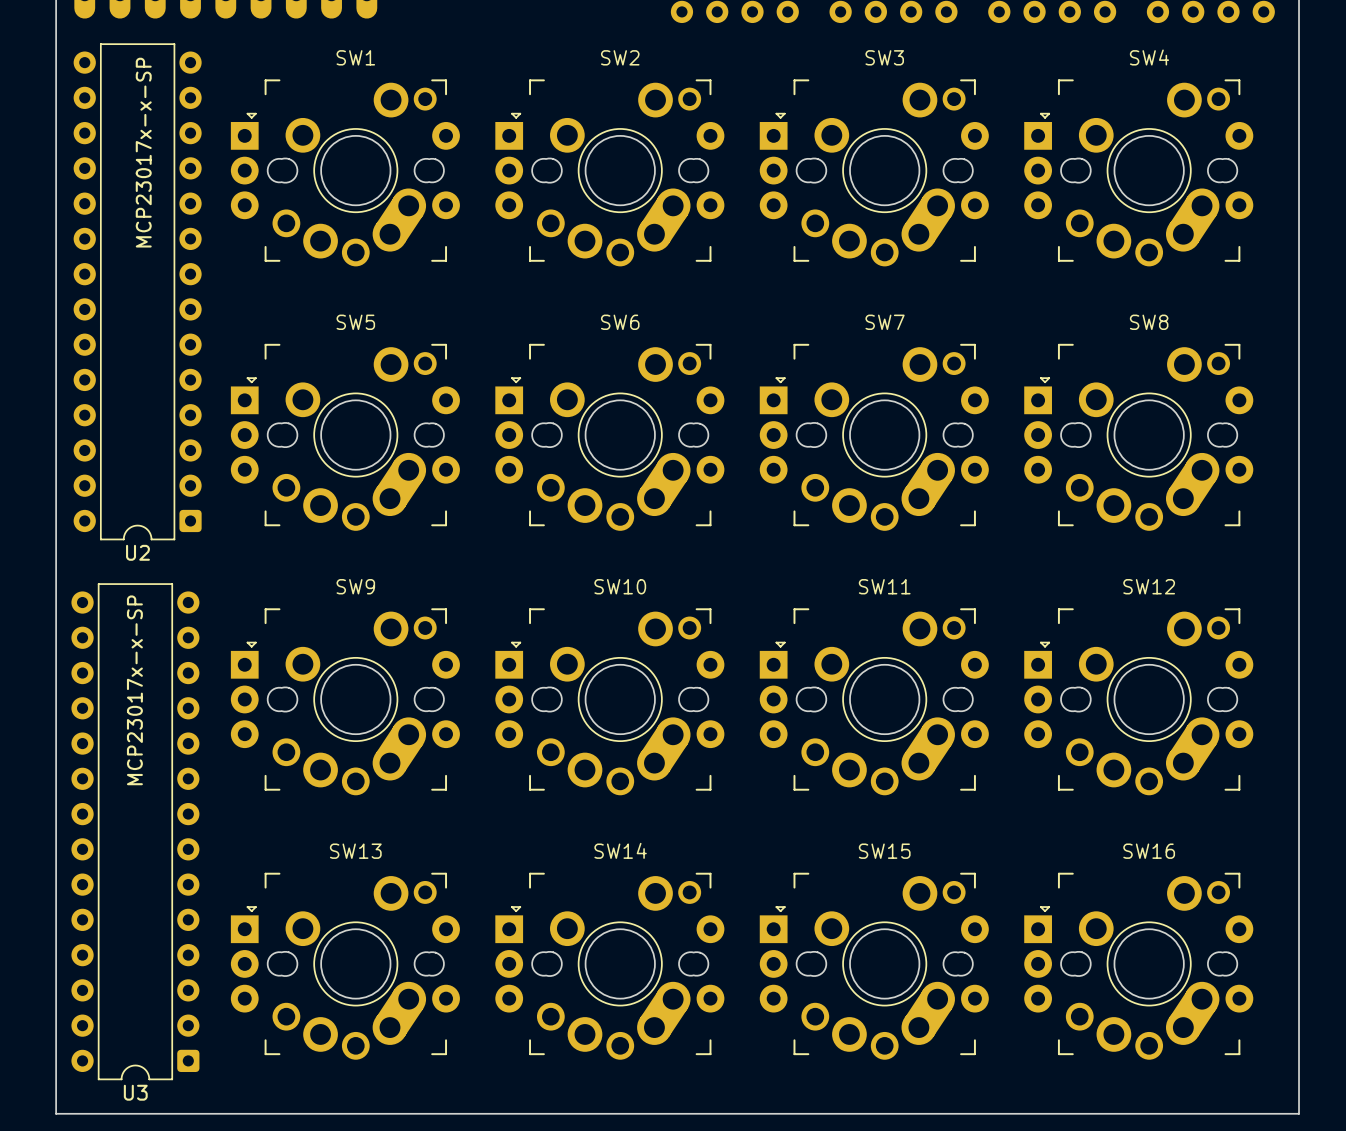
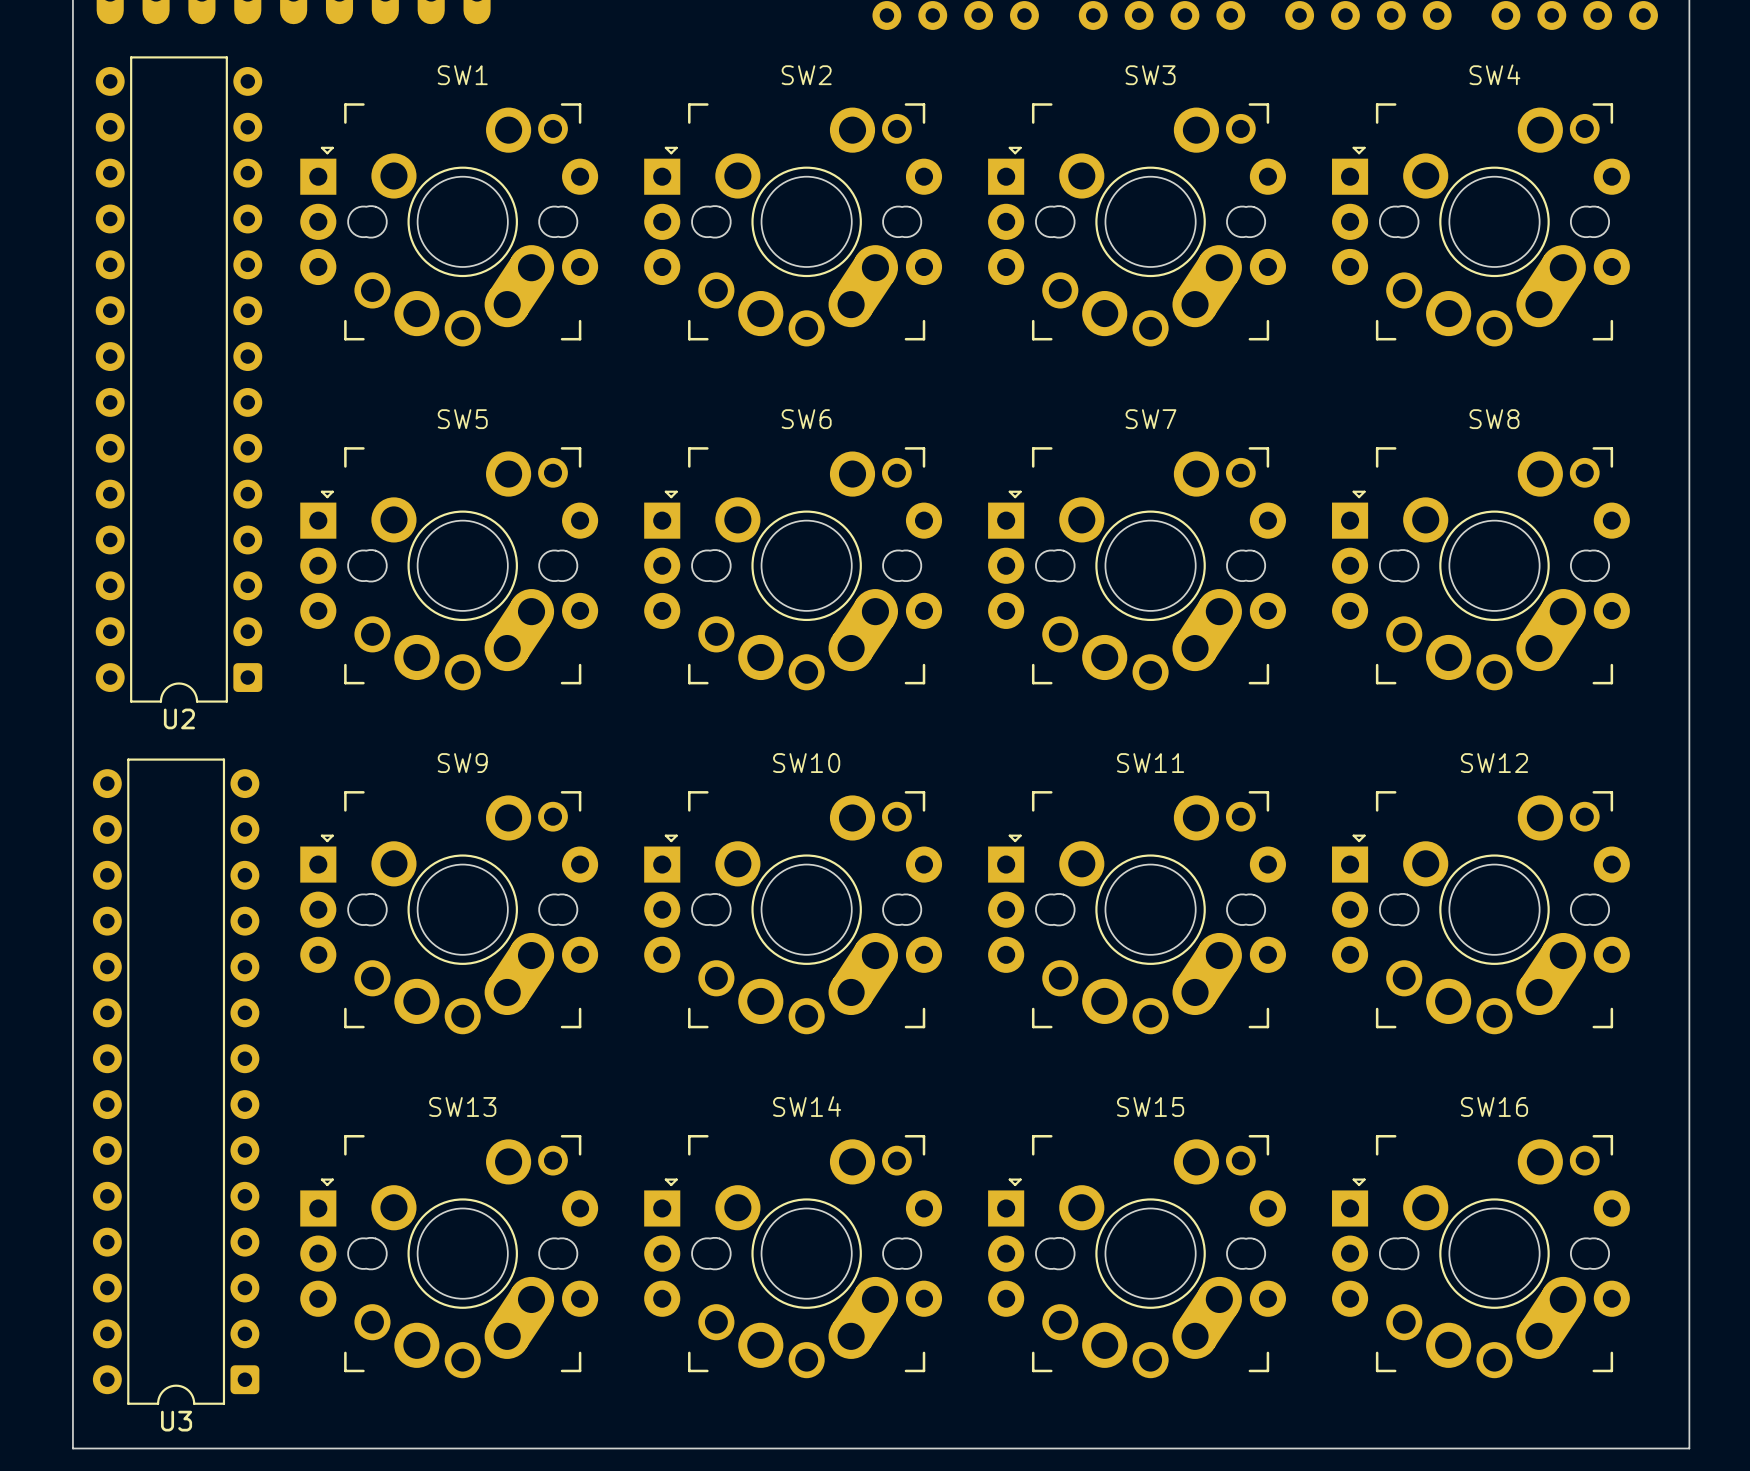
U2 value: MCP23017x-x-SP (143, 152) -> none
U3 value: MCP23017x-x-SP (134, 690) -> none

